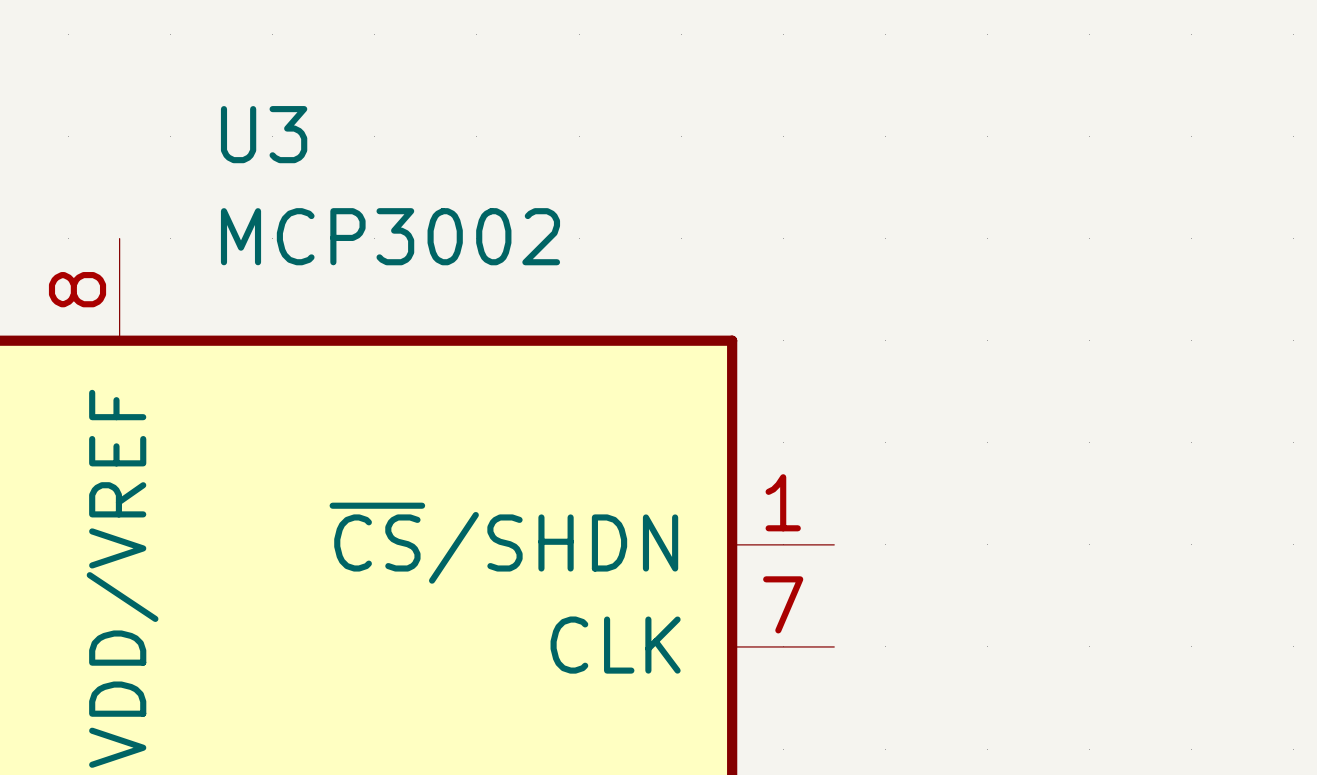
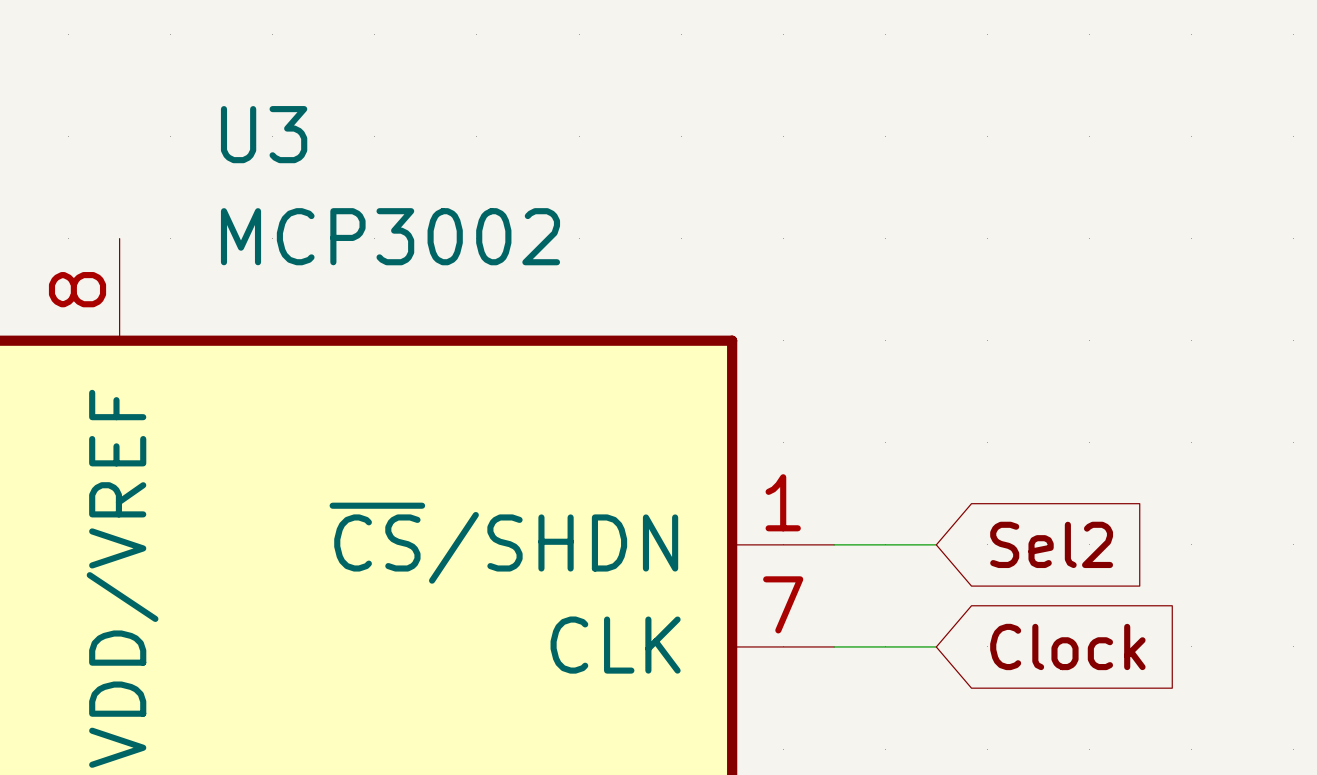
wire: none -> (834, 544) (936, 544)
global label: none -> Sel2 (1051, 544)
wire: none -> (834, 646) (936, 646)
global label: none -> Clock (1067, 646)

